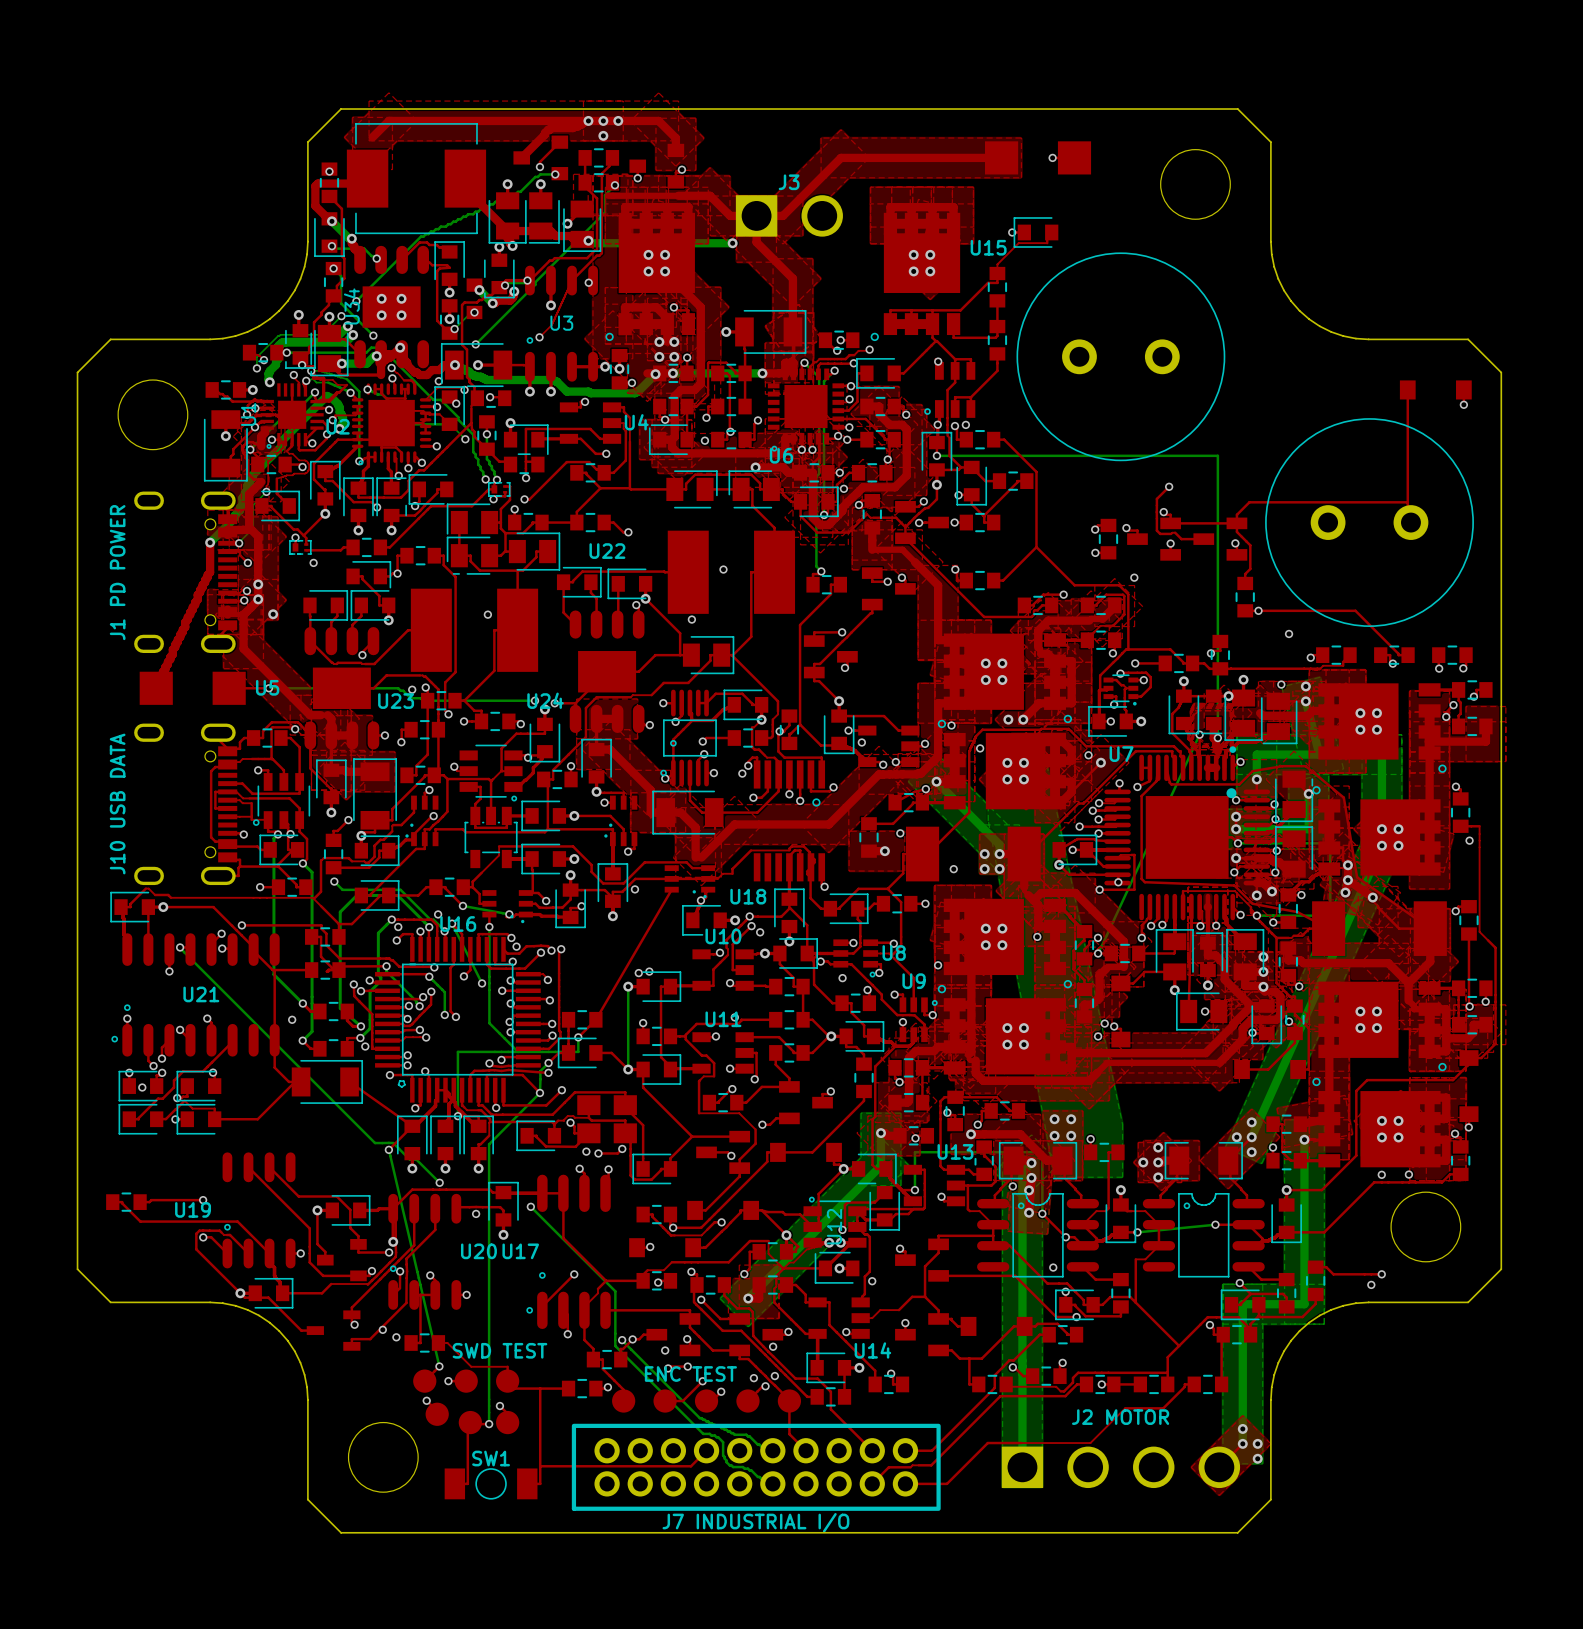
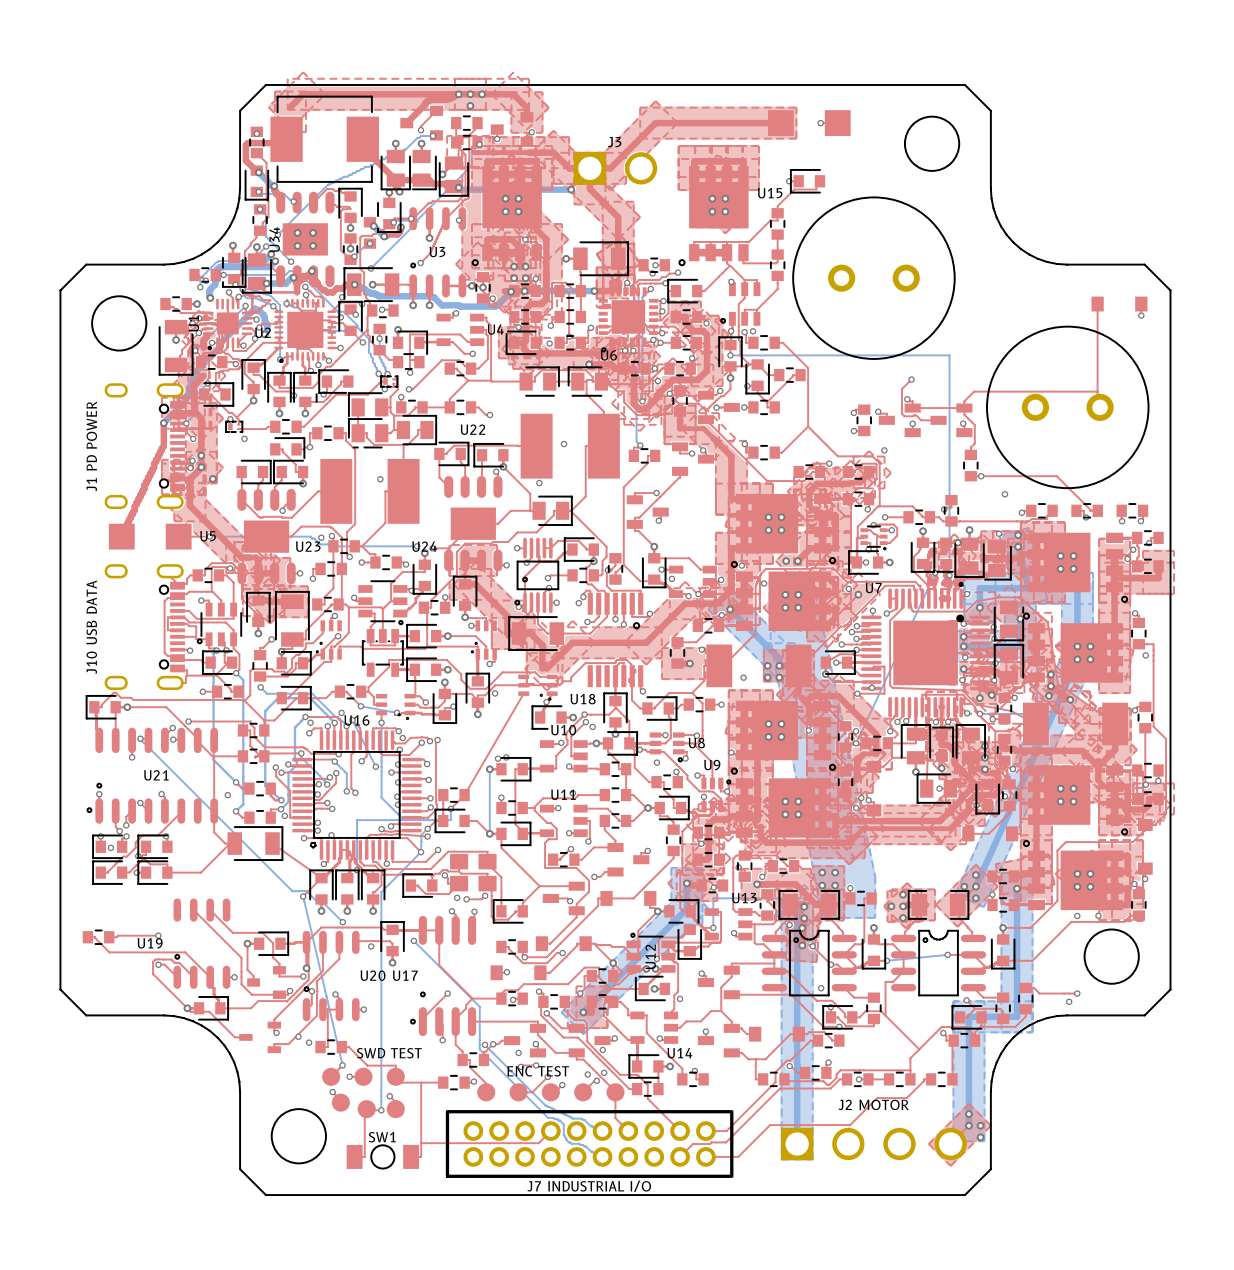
part: (816, 501) -> none

